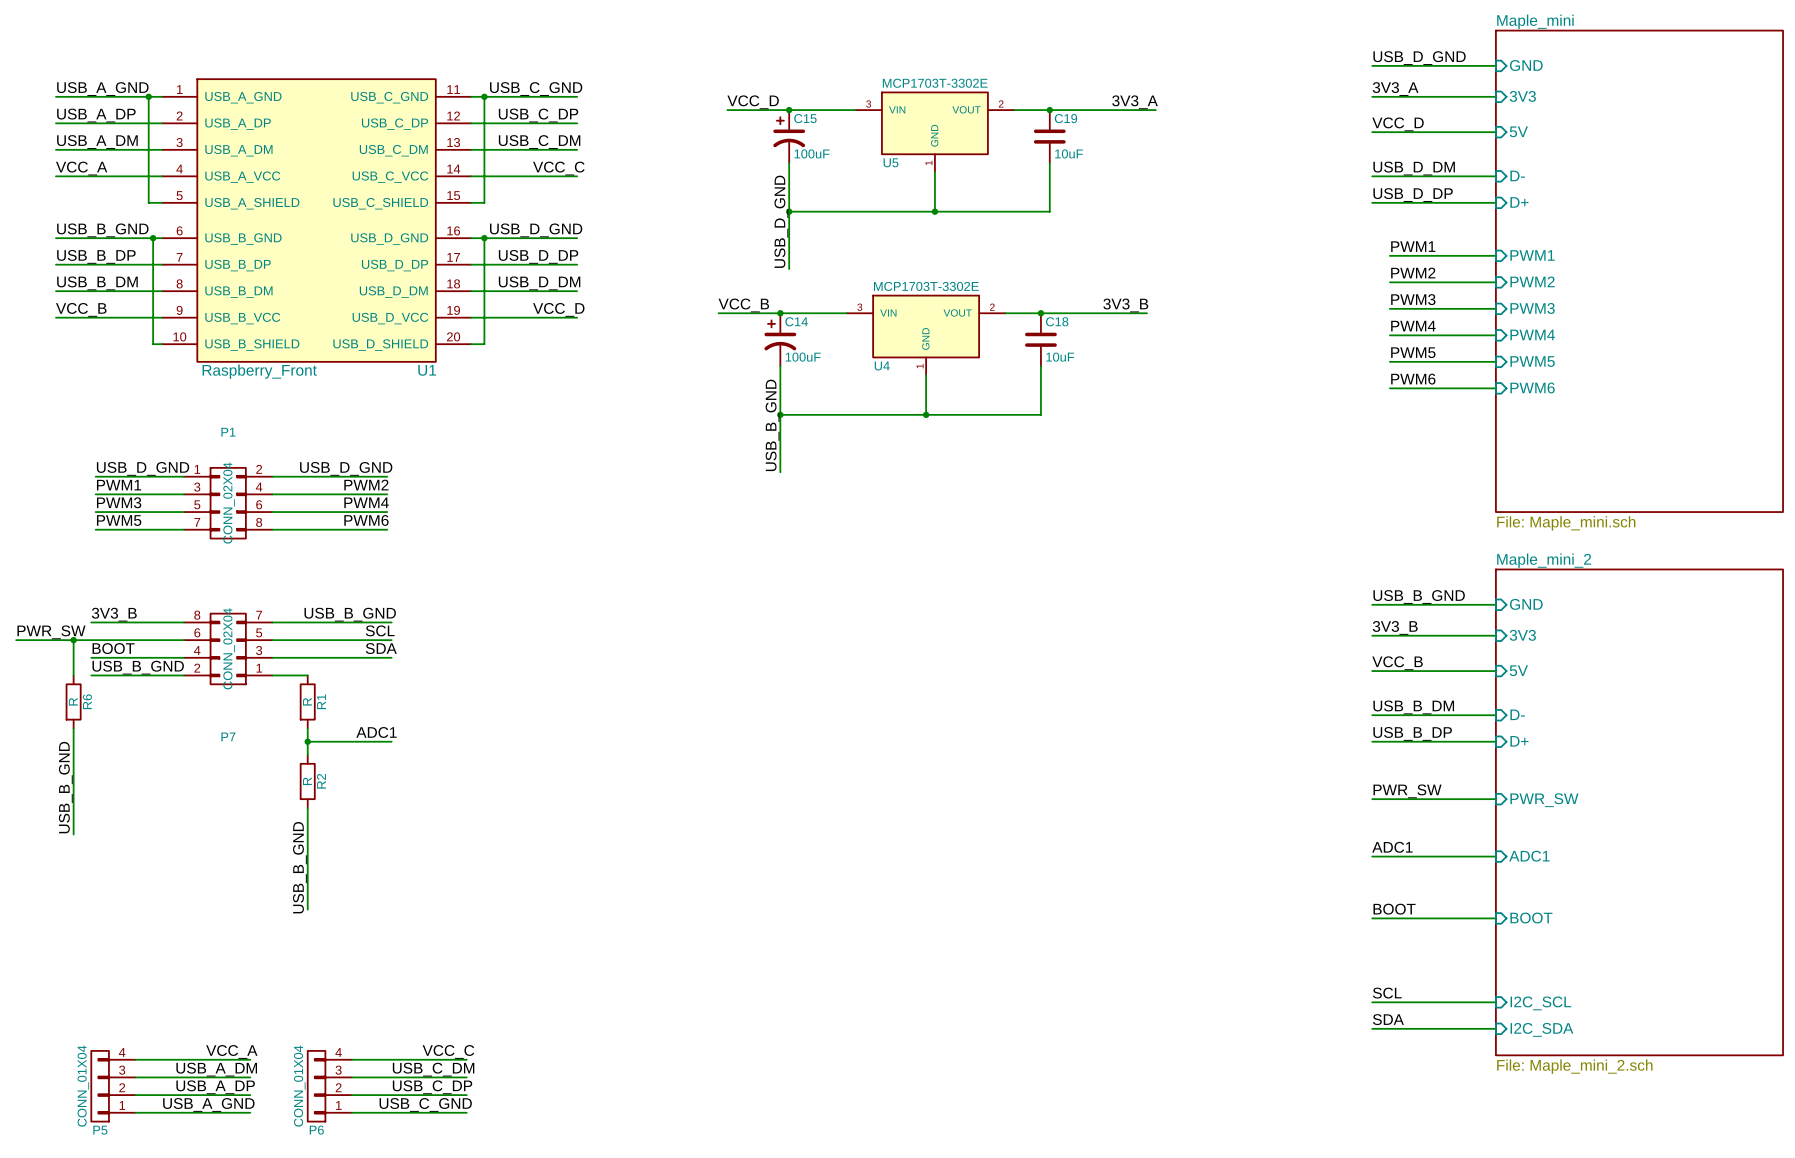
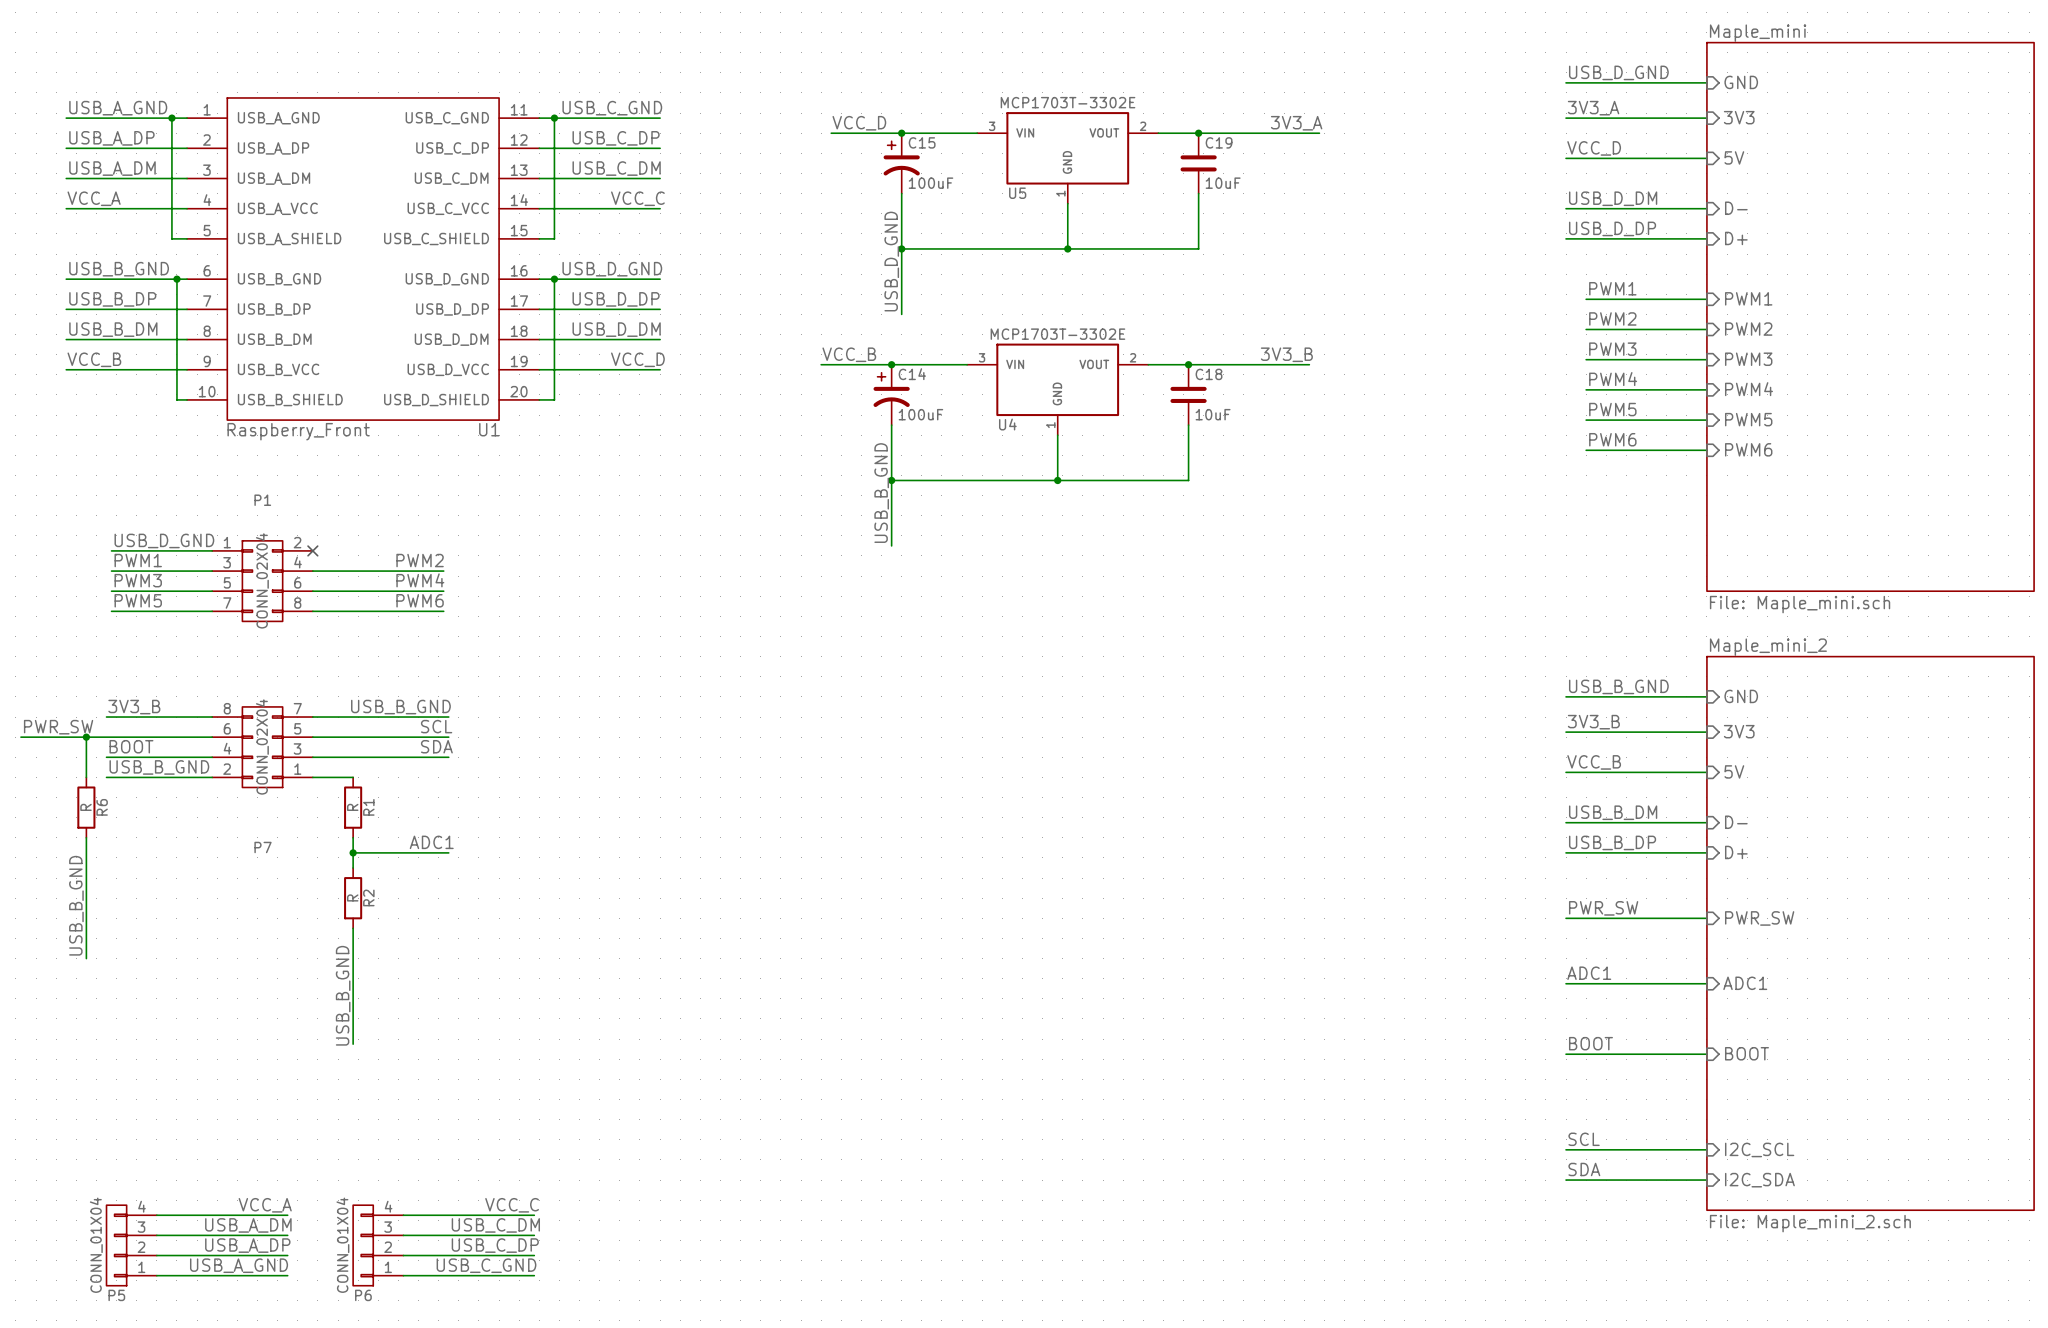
label: USB_D_GND (346, 468) -> none
wire: (272, 476) (387, 476) -> none
no-connect mark: none -> (312, 550)

